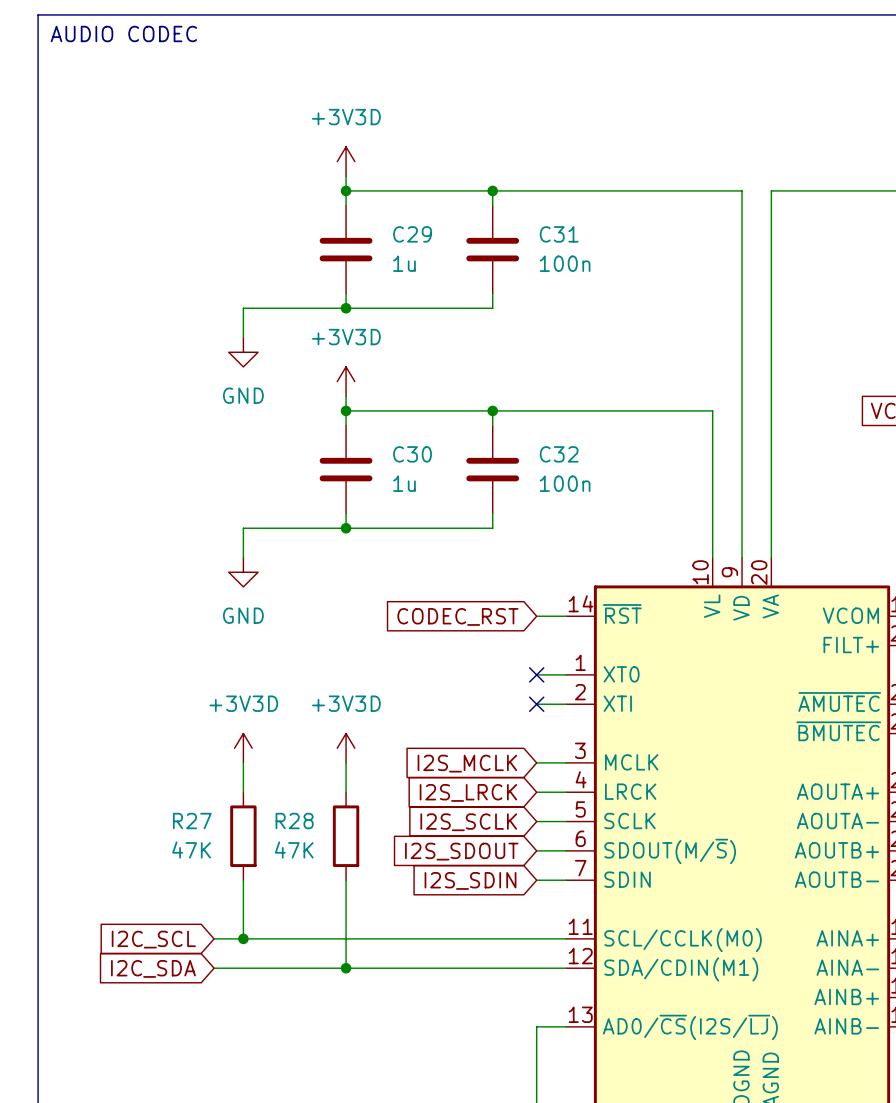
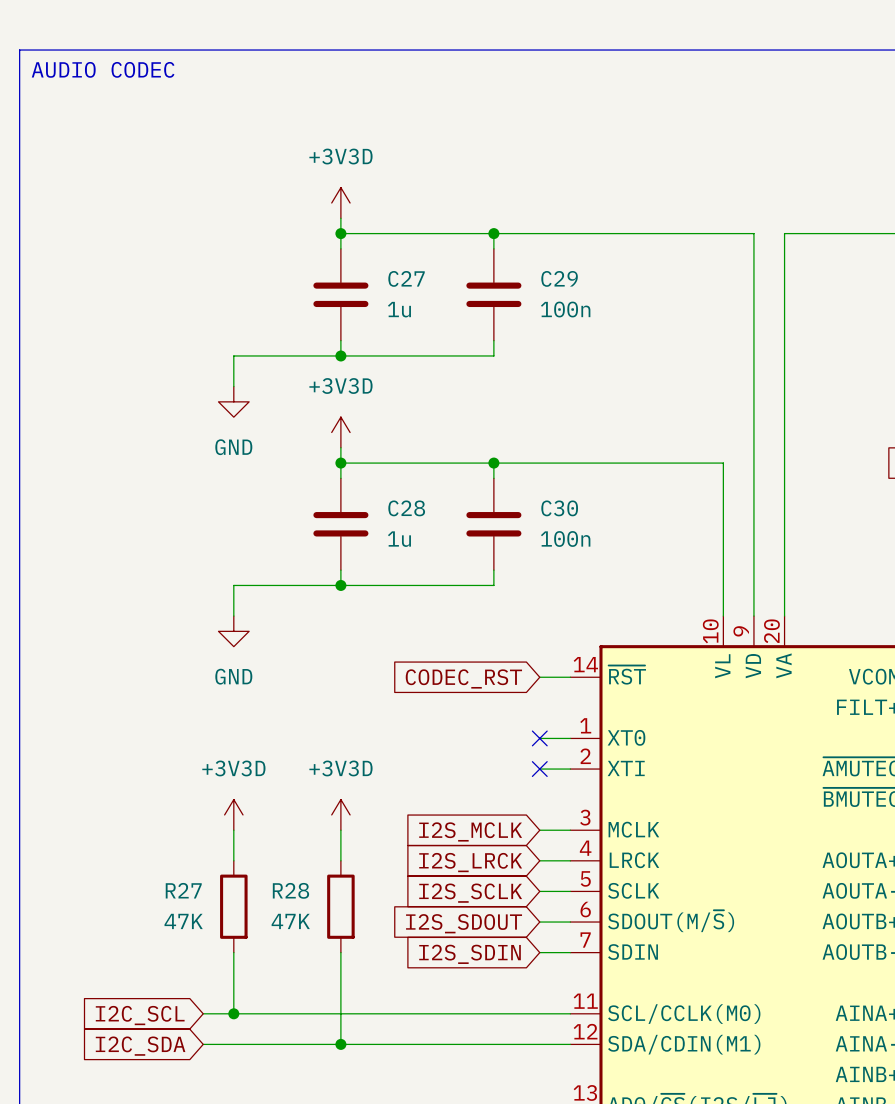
C29 name: C29 (412, 234) -> C27 (406, 278)
C31 name: C31 (559, 234) -> C29 (559, 278)
C30 name: C30 (412, 454) -> C28 (406, 508)
C32 name: C32 (559, 454) -> C30 (559, 508)

